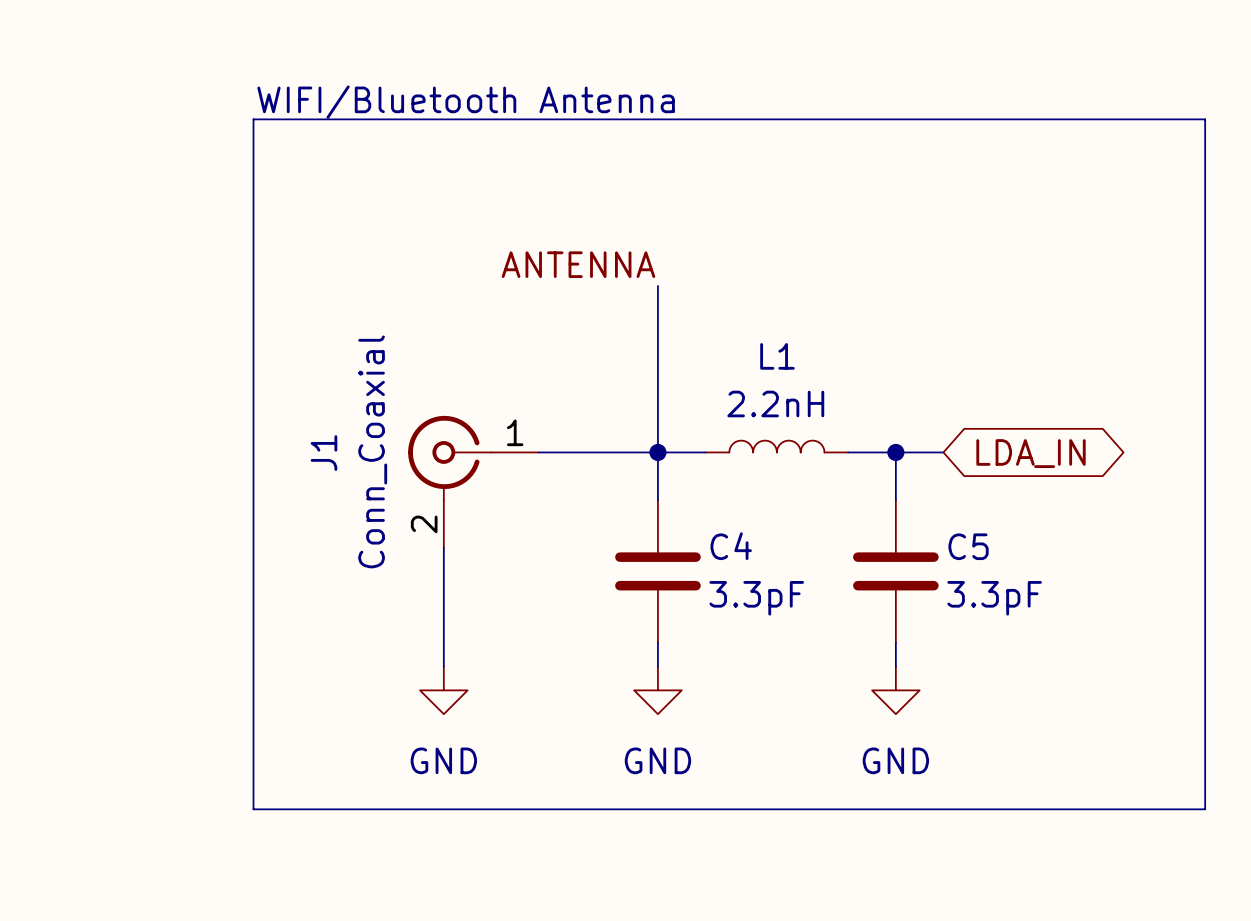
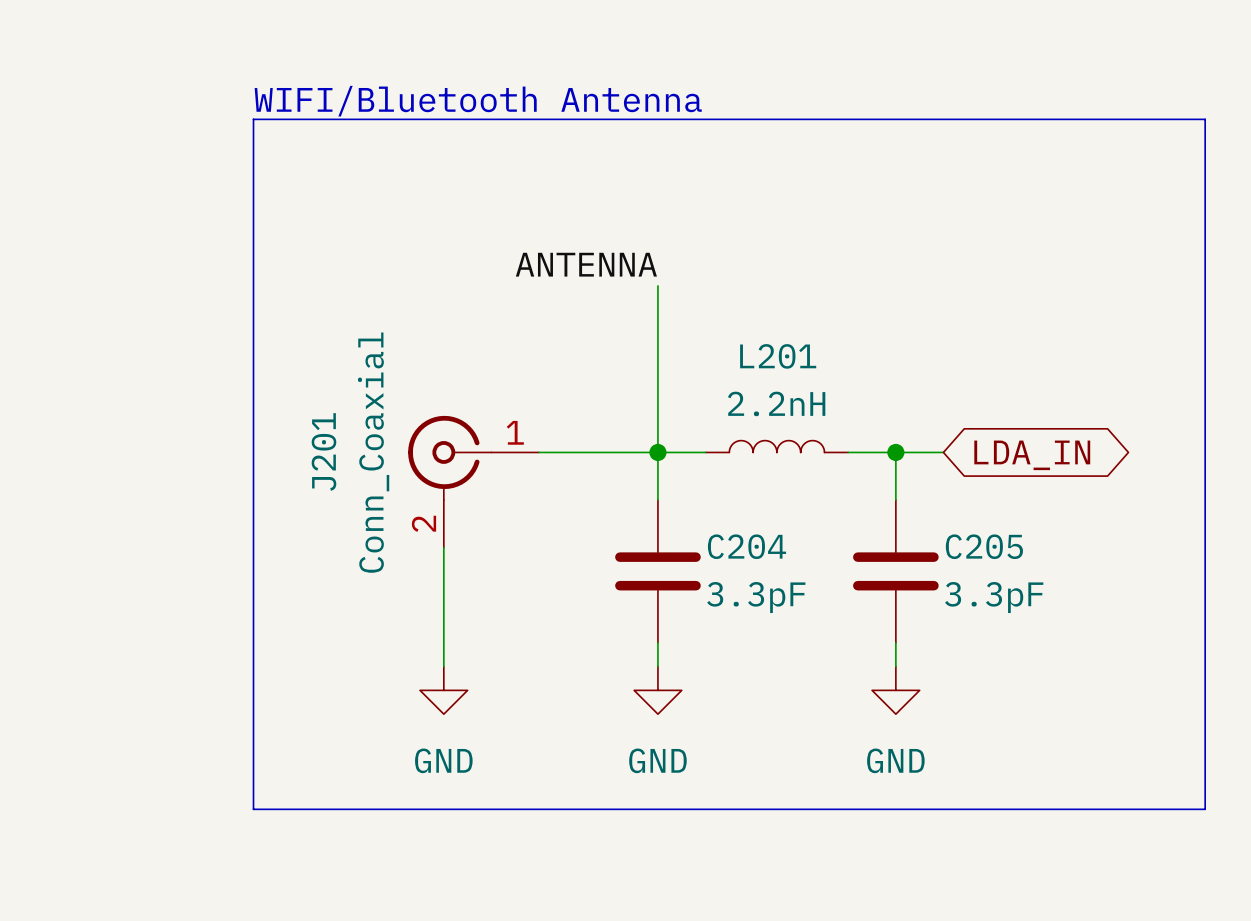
L1 name: L1 (777, 356) -> L201 (778, 356)
J1 name: J1 (323, 453) -> J201 (323, 451)
C4 name: C4 (731, 546) -> C204 (746, 546)
C5 name: C5 (968, 546) -> C205 (984, 546)

